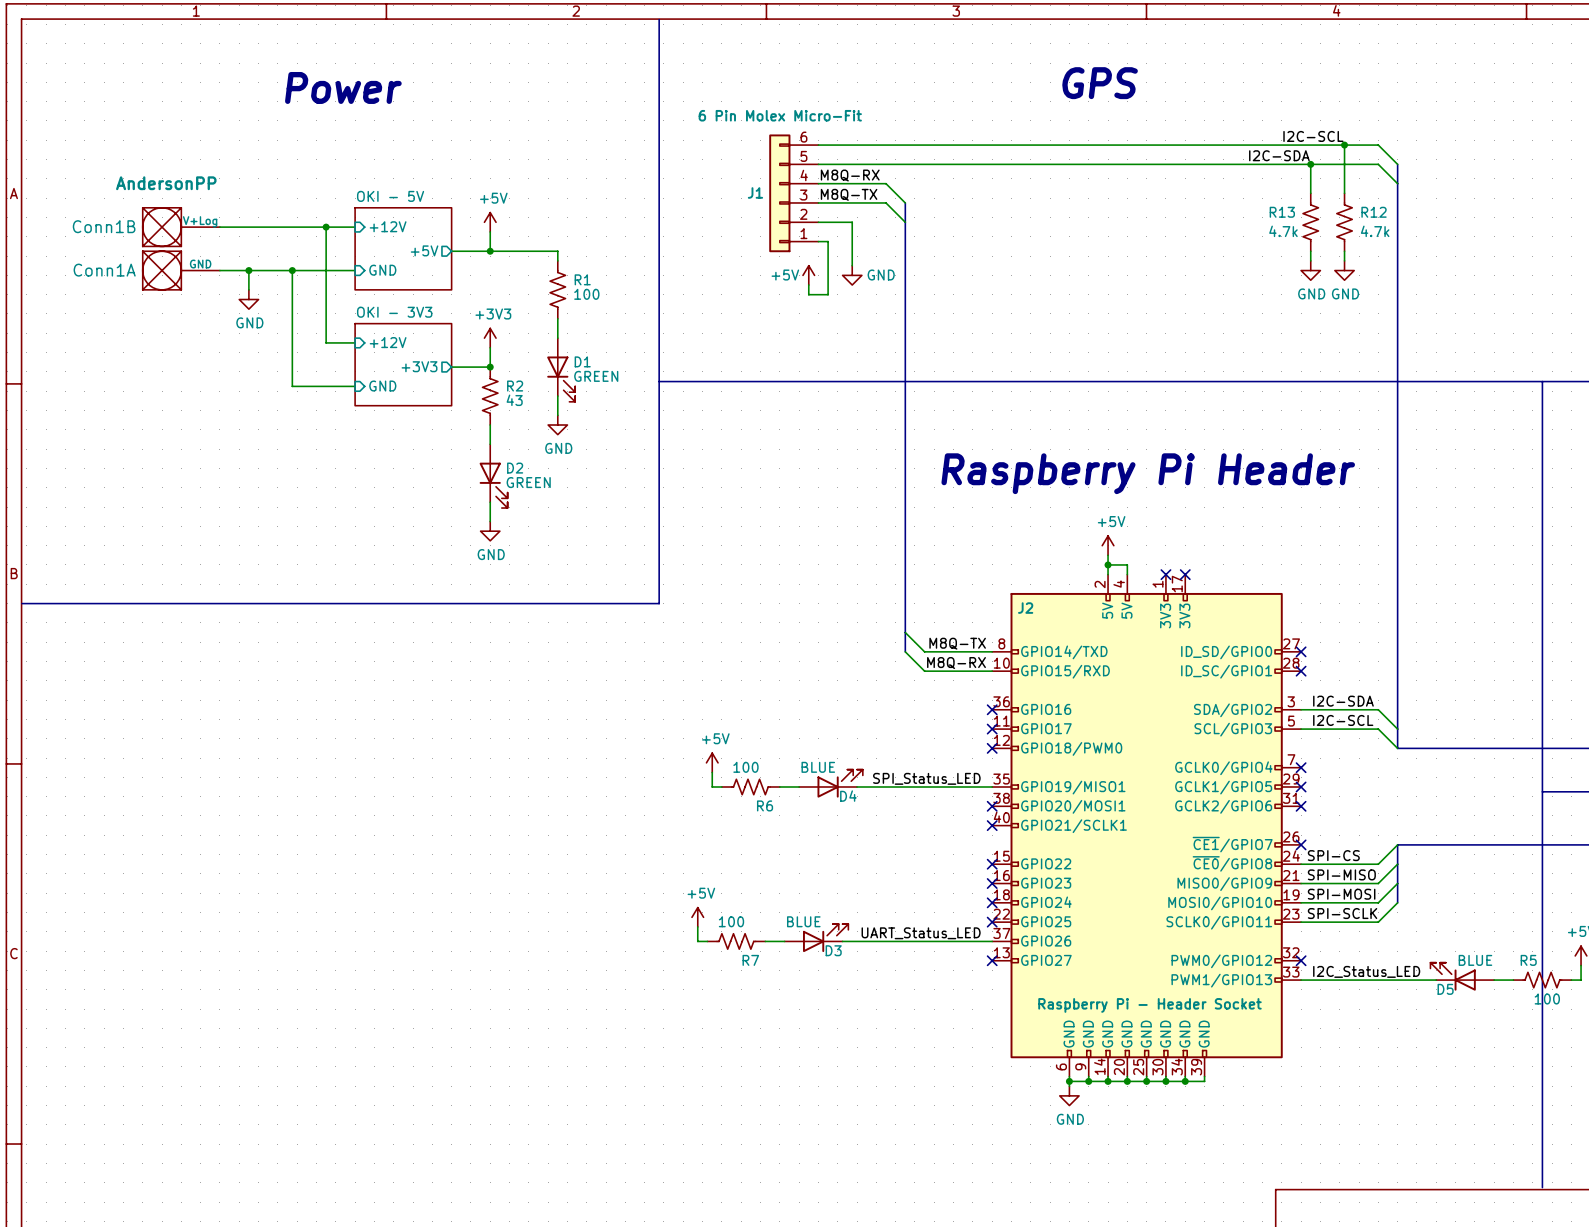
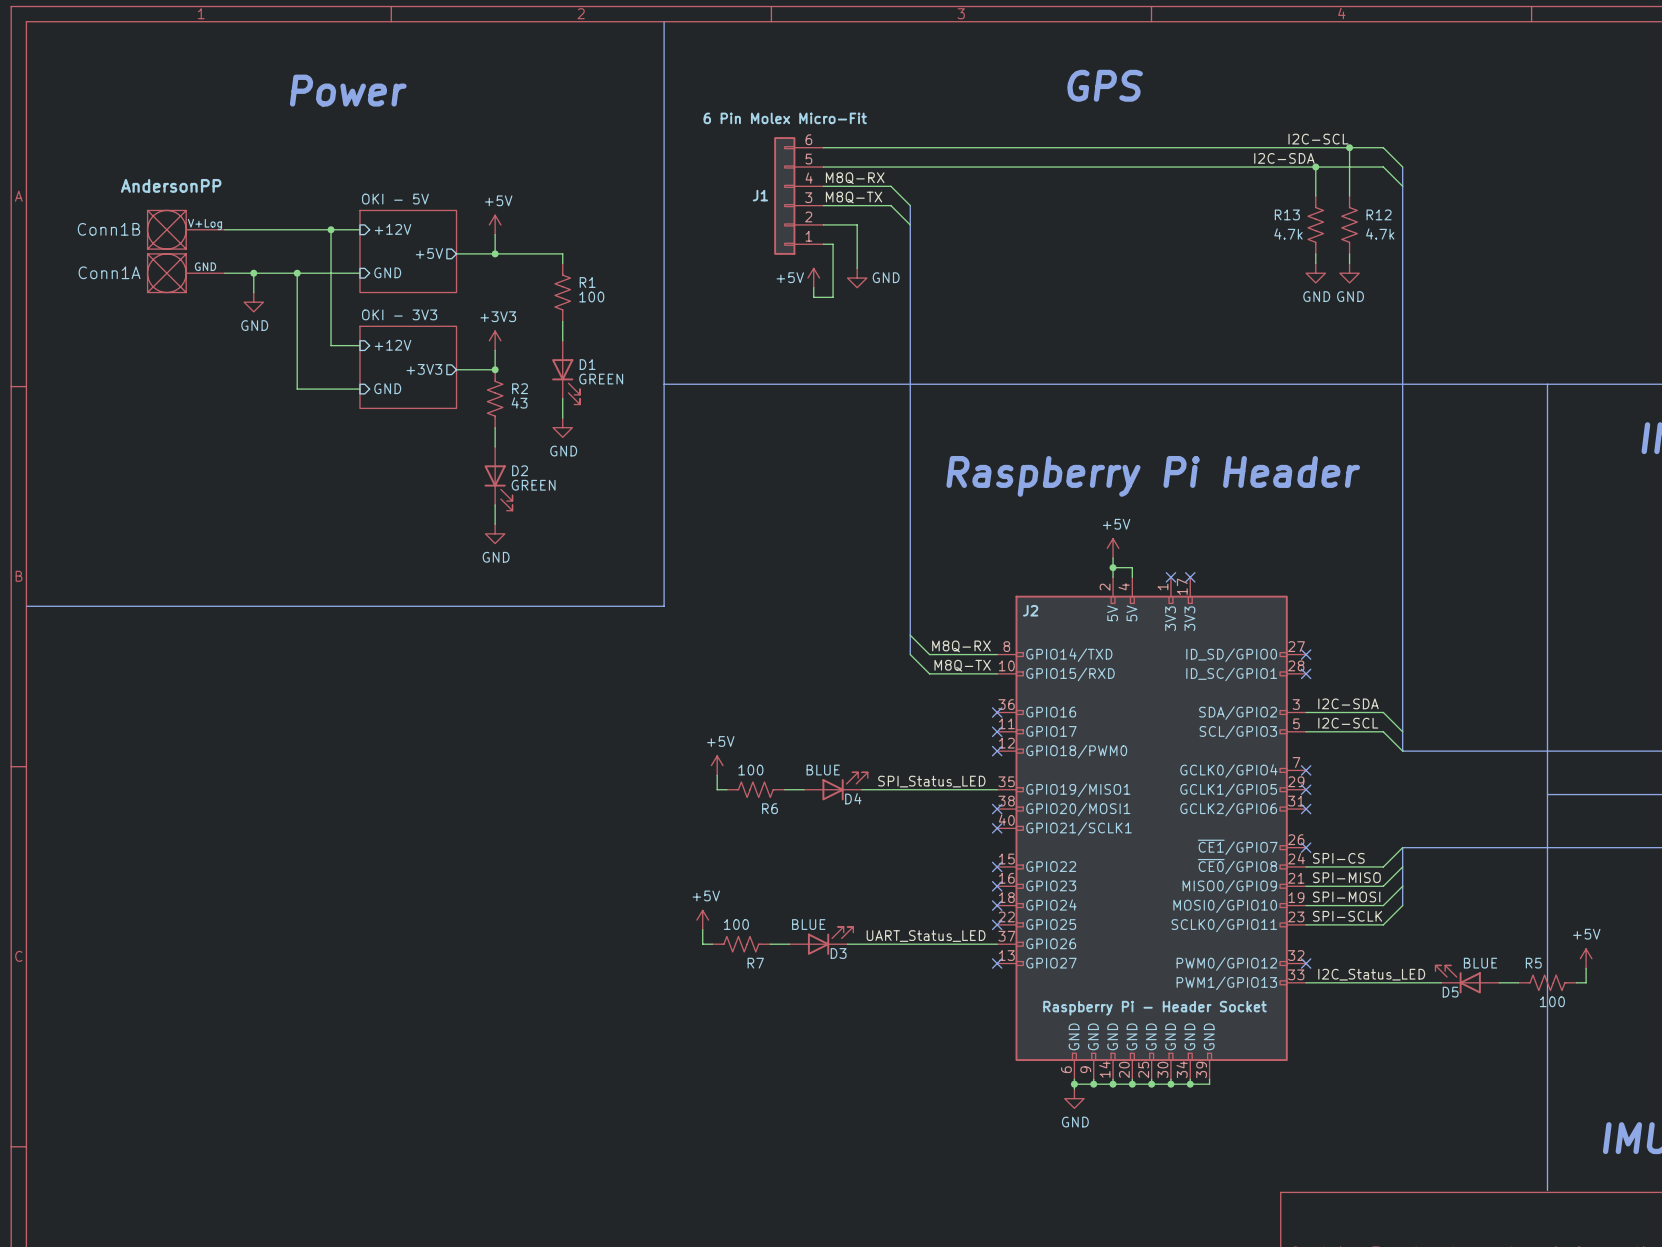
label: M8Q-TX (957, 643) -> M8Q-RX (961, 646)
label: M8Q-RX (956, 663) -> M8Q-TX (962, 665)

